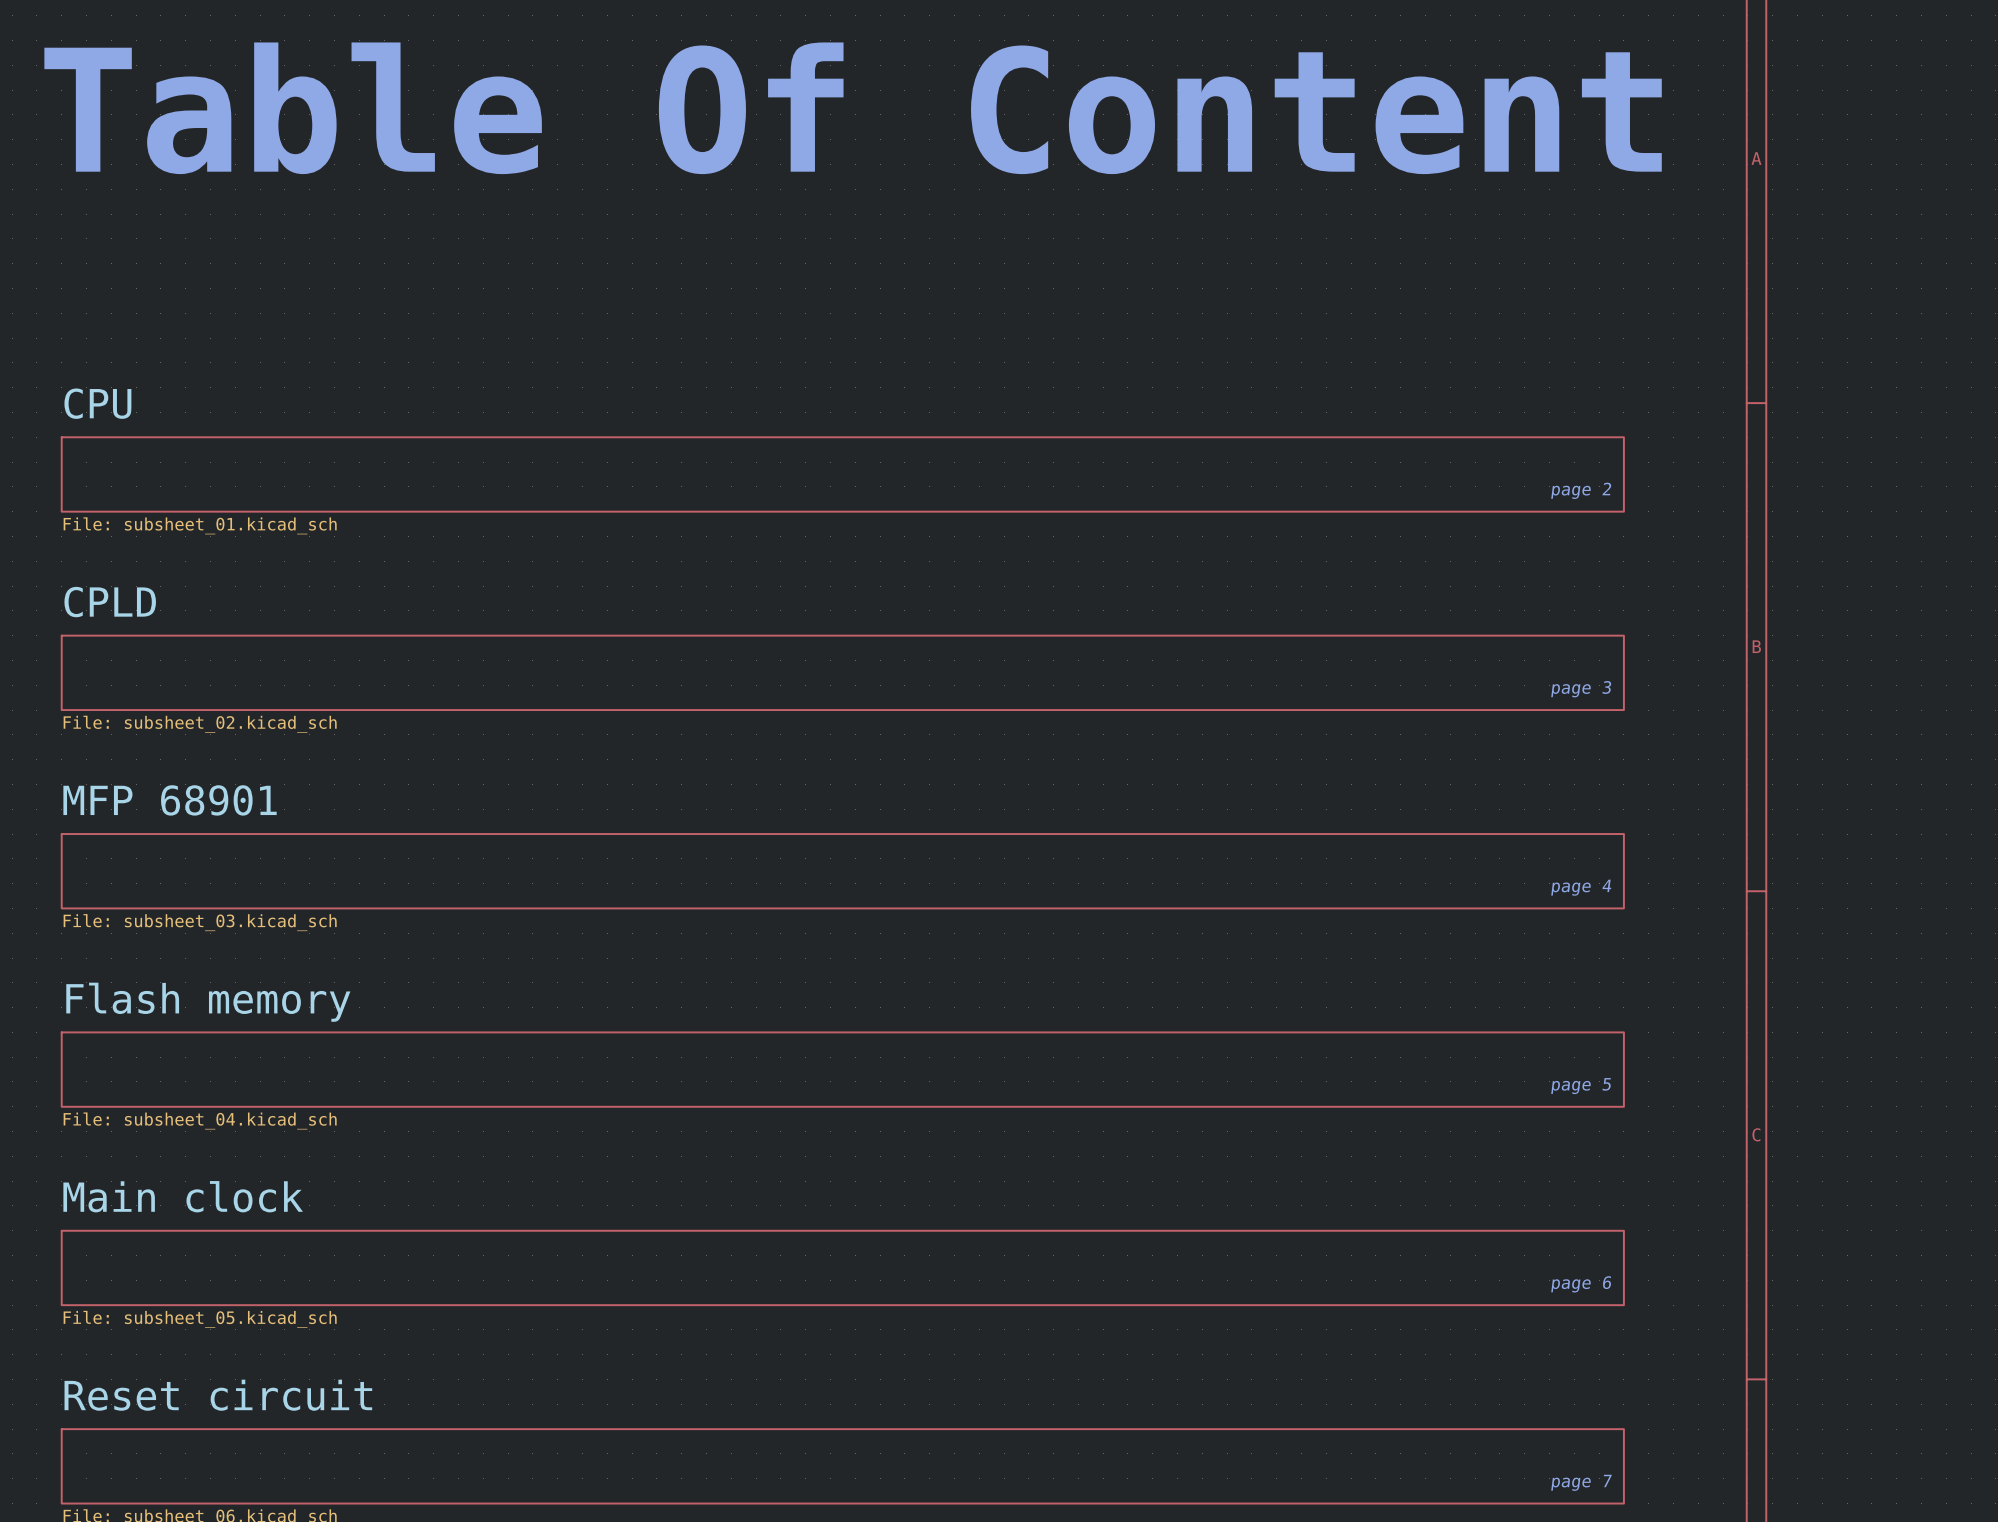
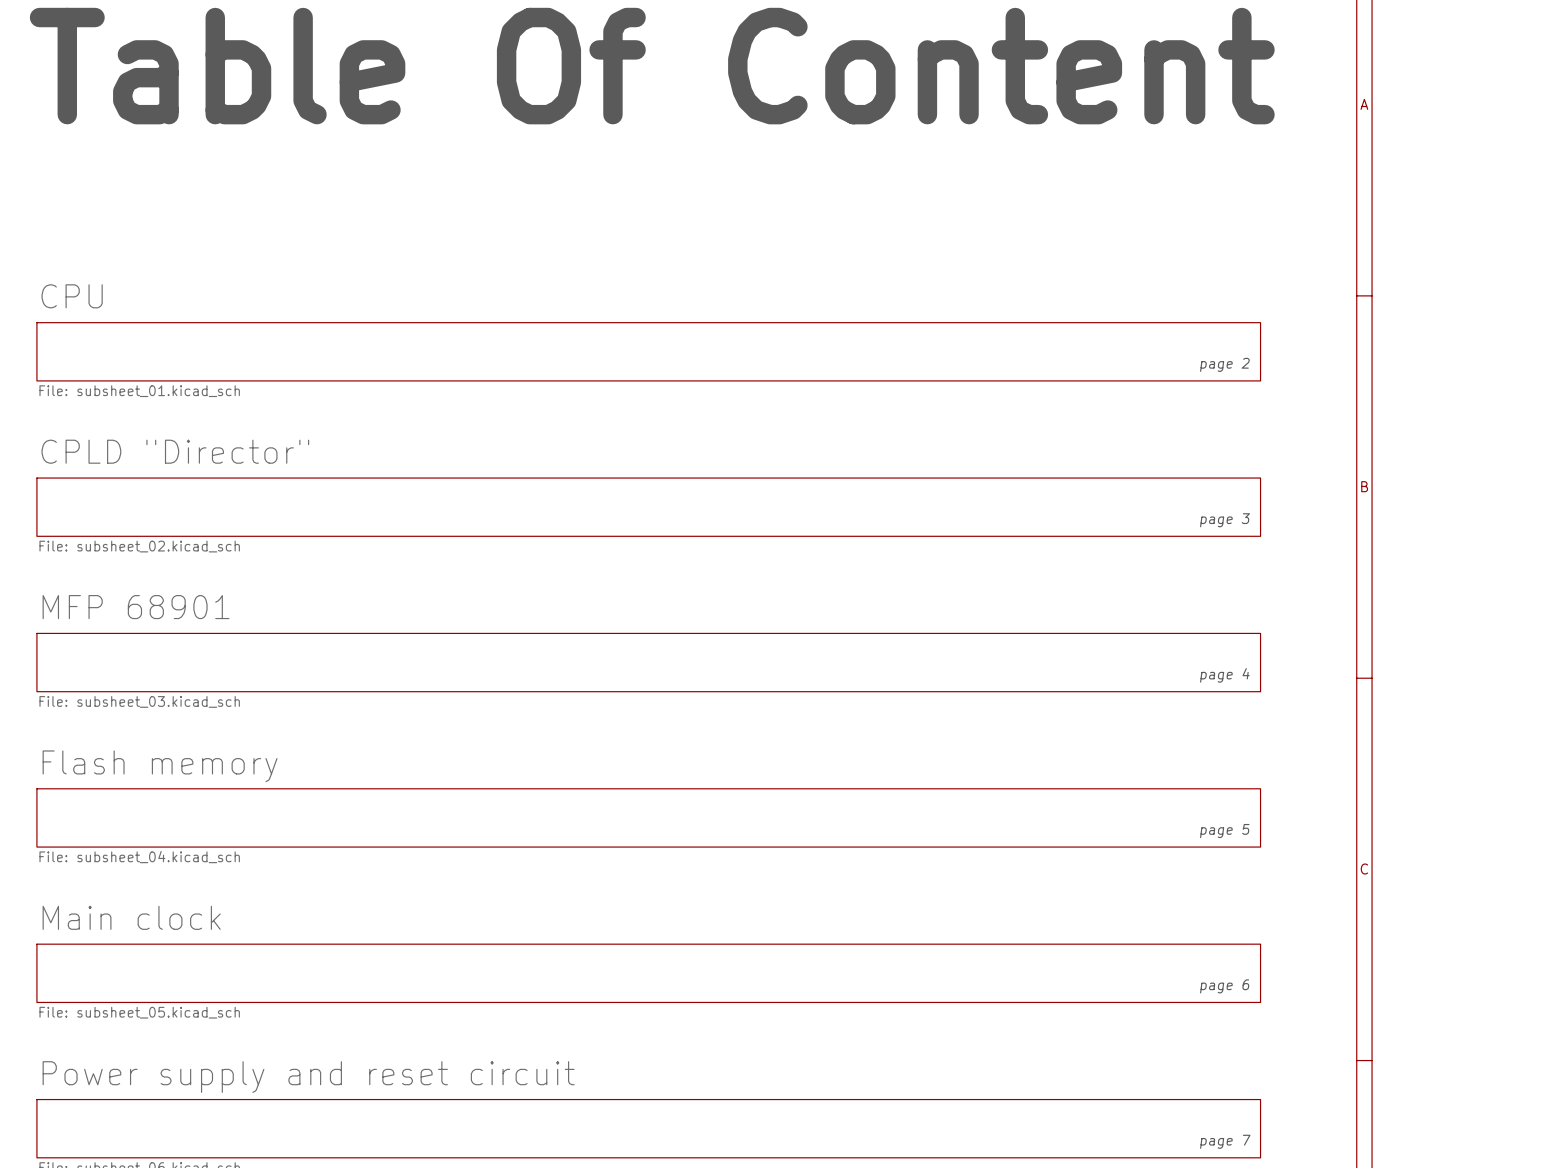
sheet CPLD name: CPLD (110, 602) -> CPLD "Director" (175, 451)
sheet Reset circuit name: Reset circuit (218, 1395) -> Power supply and reset circuit (308, 1077)

